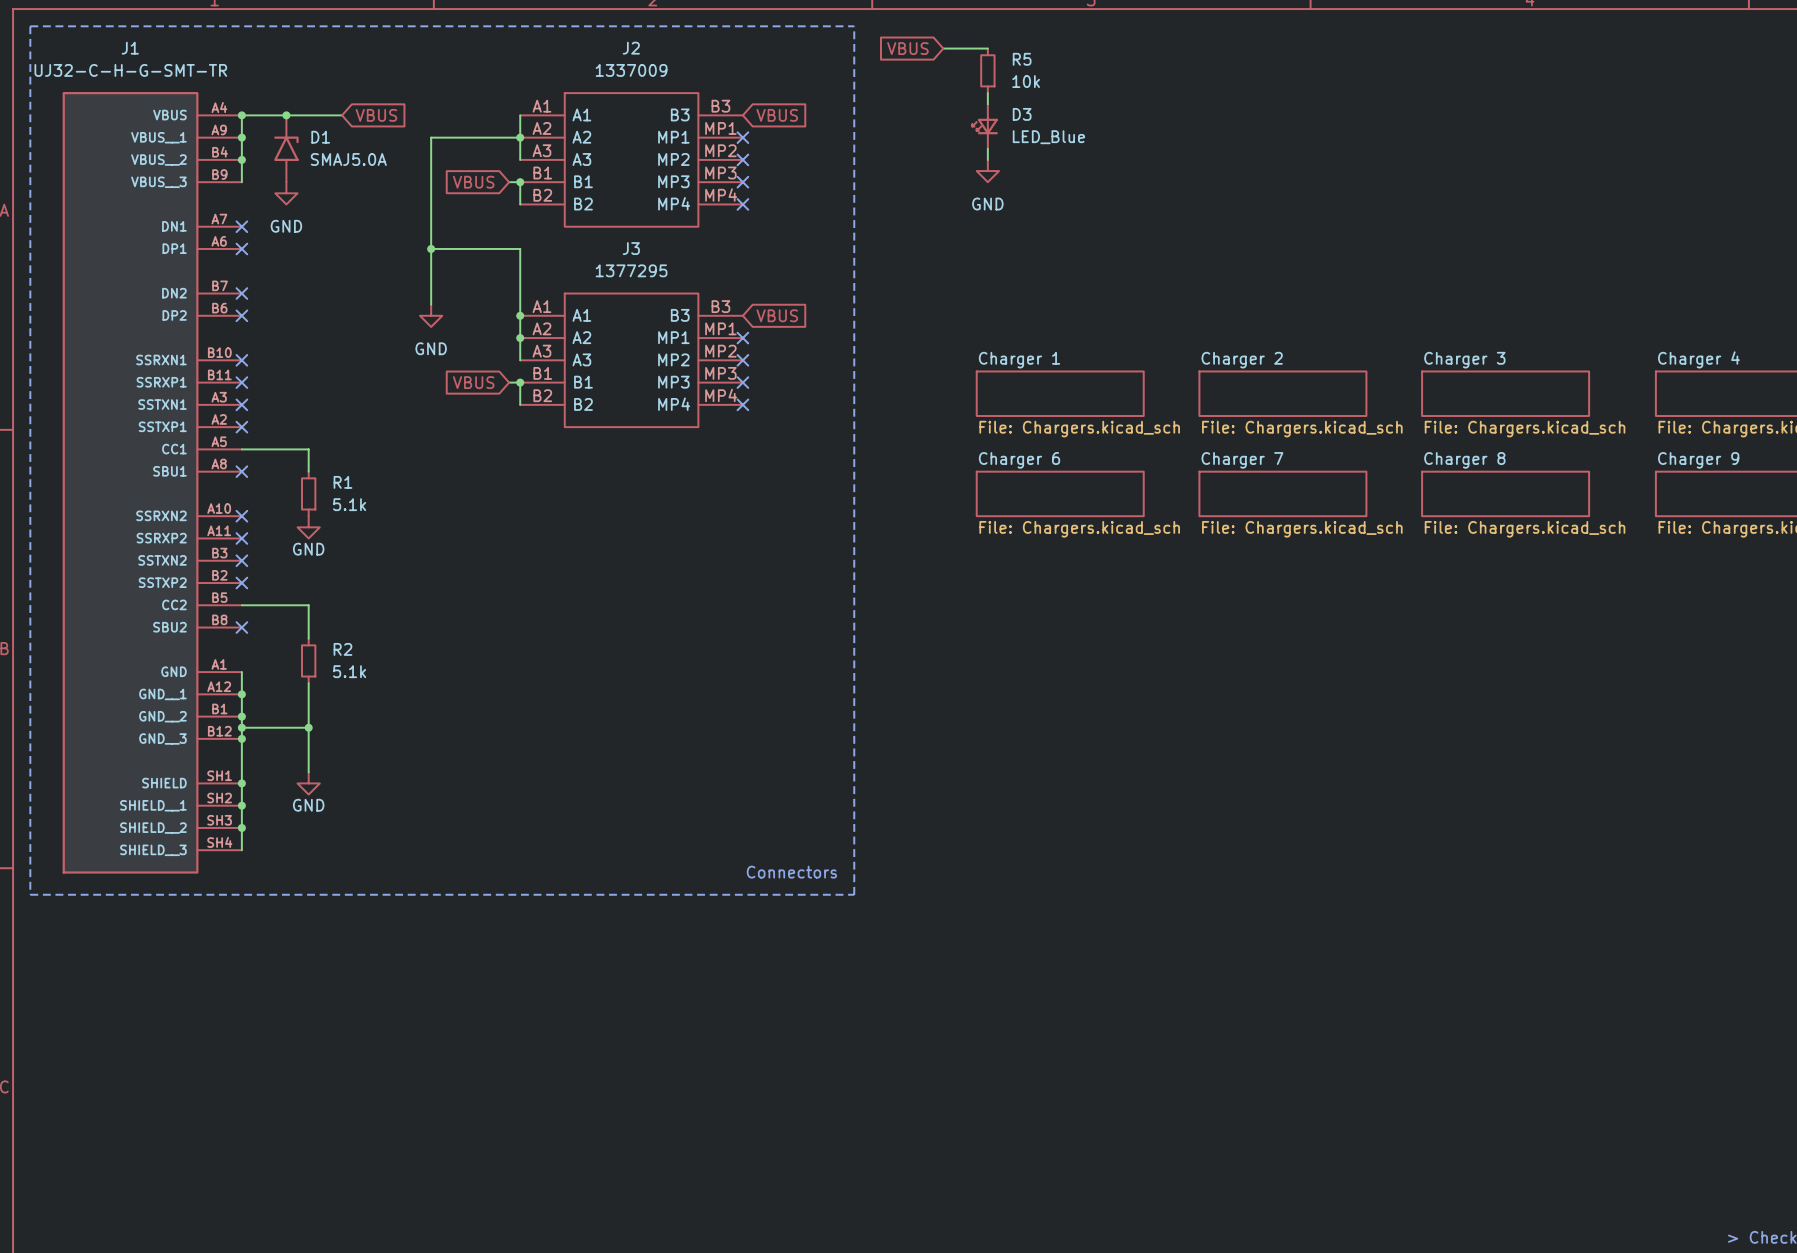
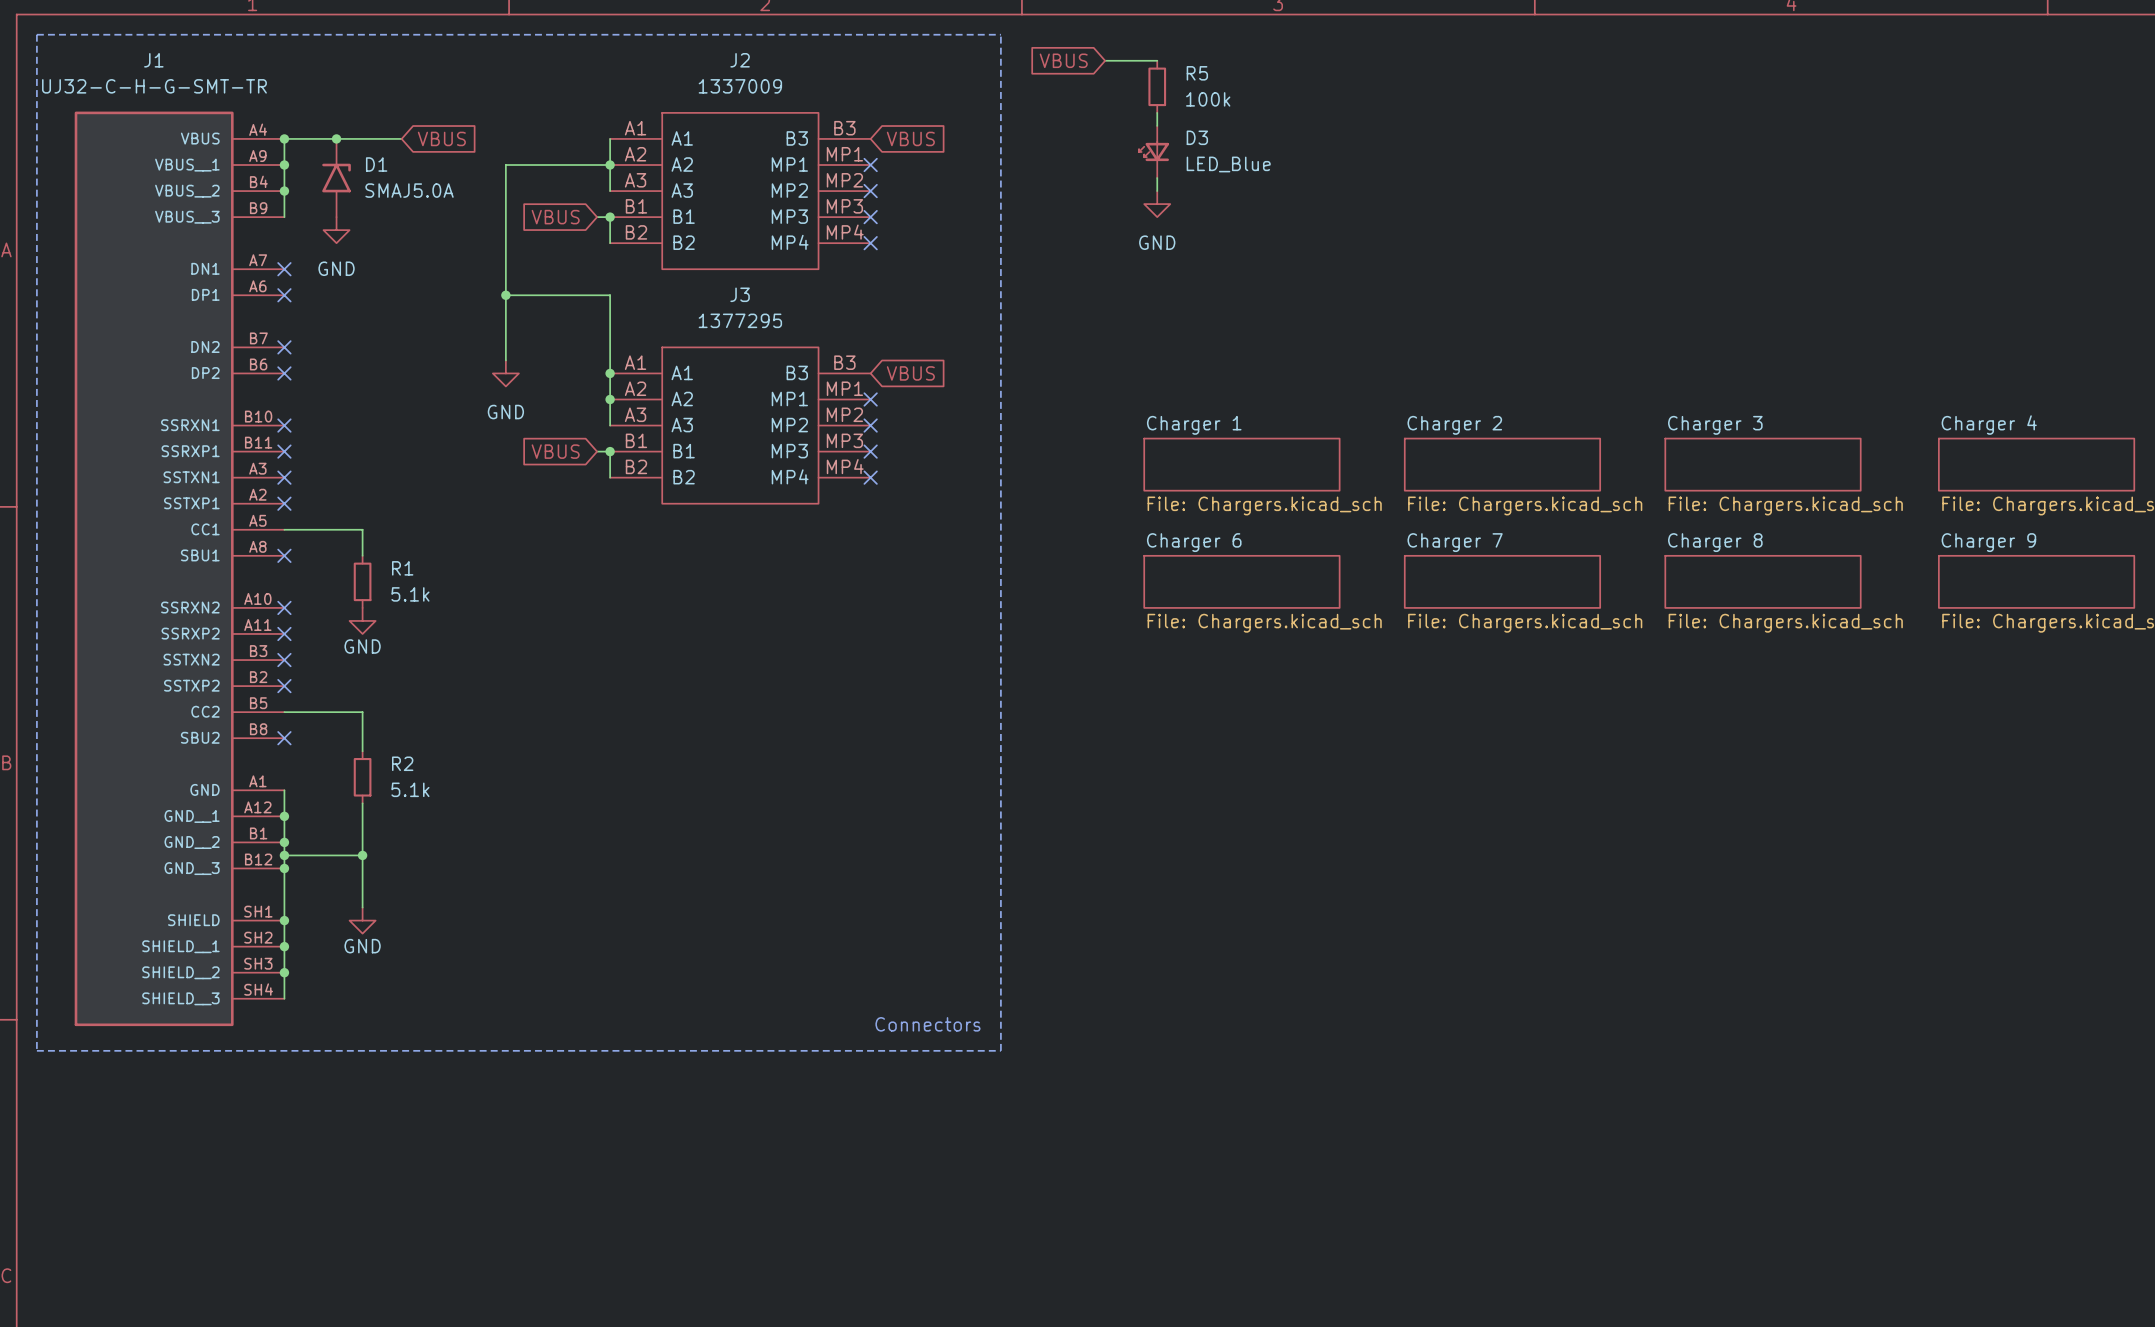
R5 value: 10k (1026, 81) -> 100k (1208, 99)

